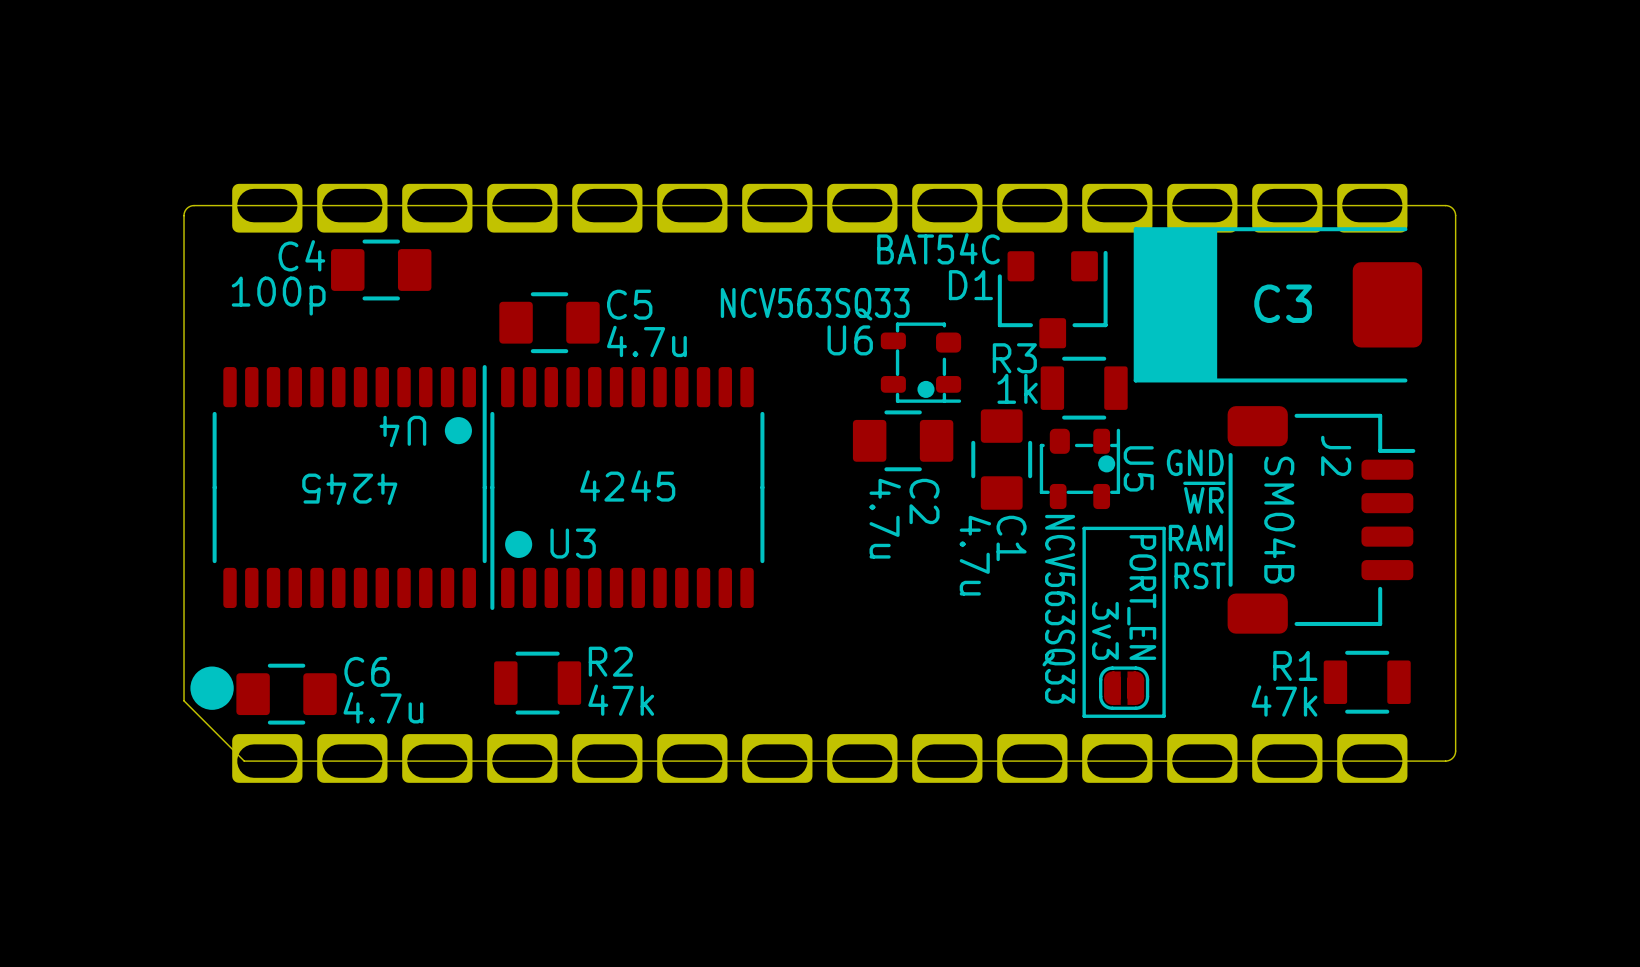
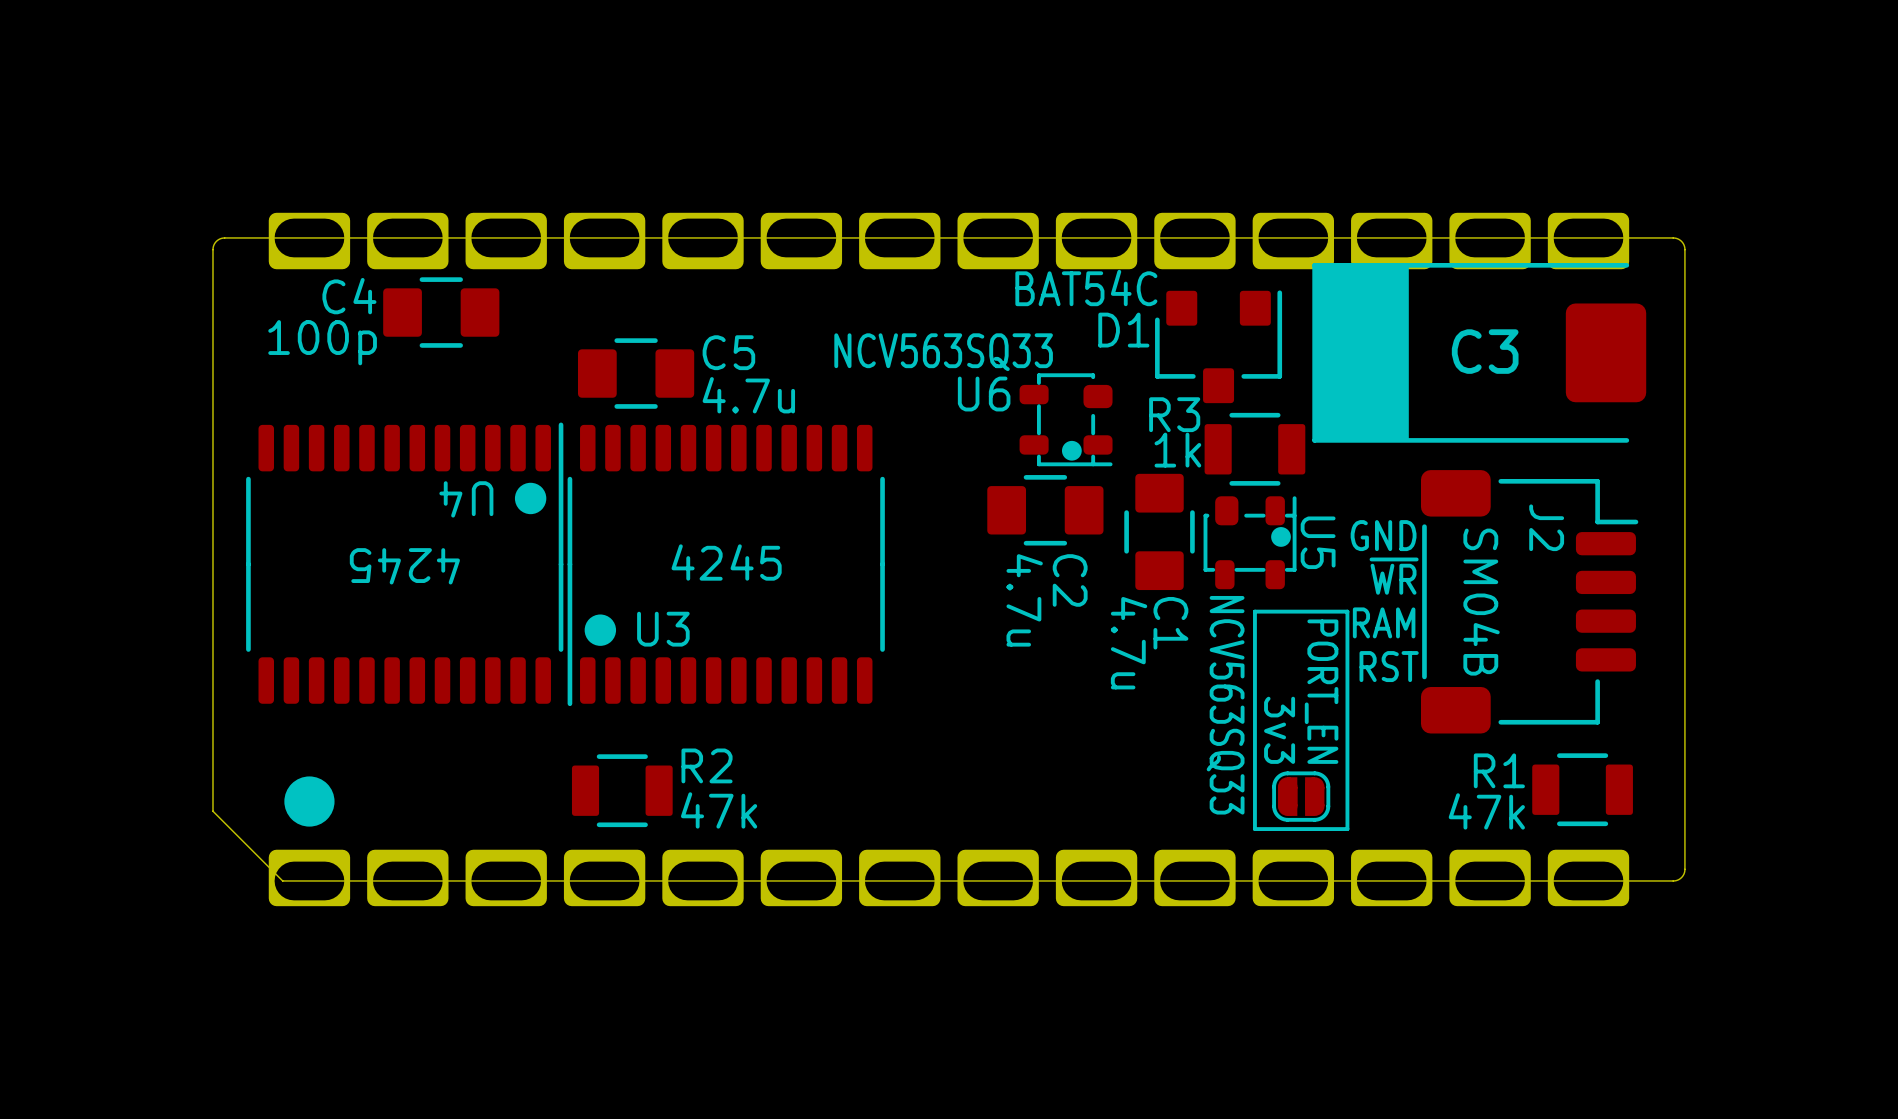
drawing position: (212, 688) -> (309, 801)
C6: 4.7u (286, 694) -> none

